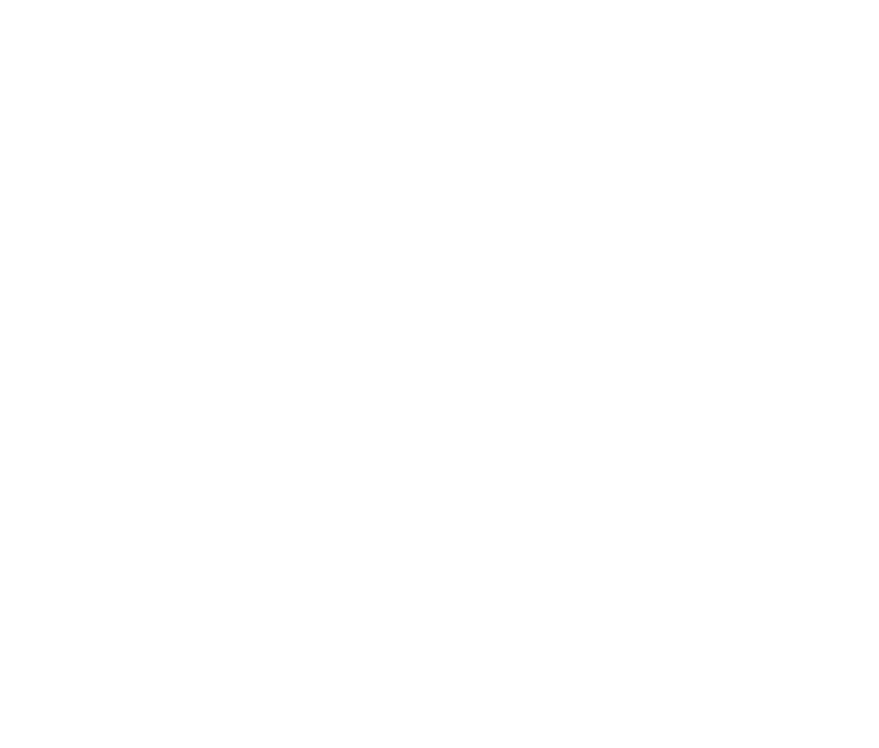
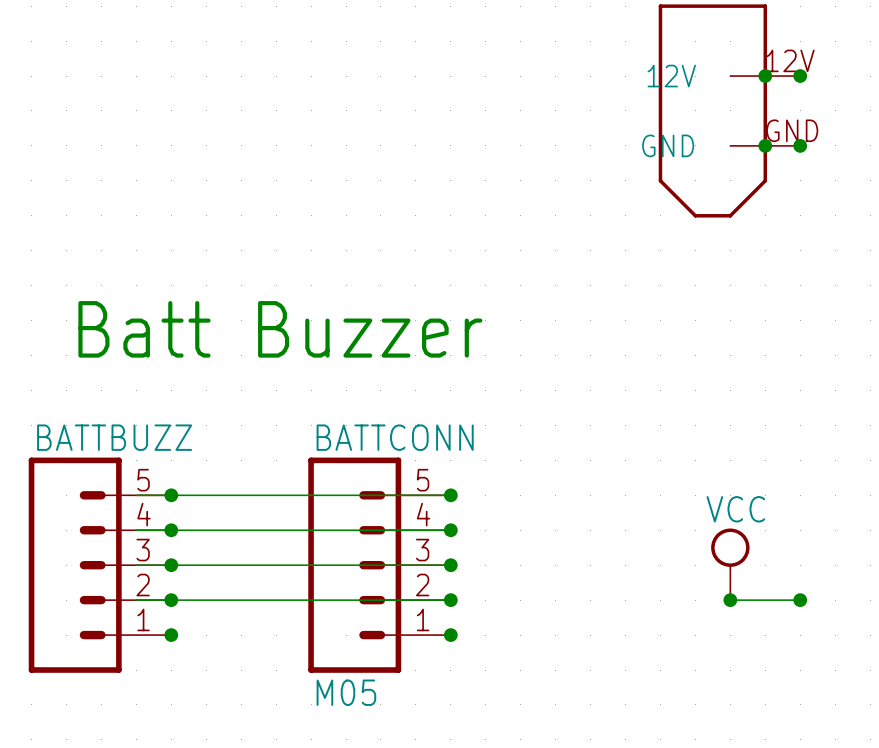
junction: none -> (765, 76)
junction: none -> (800, 76)
part: none -> (729, 110)
junction: none -> (765, 145)
junction: none -> (800, 145)
text: none -> Batt Buzzer (280, 329)
wire: none -> (136, 495) (450, 495)
junction: none -> (171, 495)
junction: none -> (450, 495)
wire: none -> (136, 530) (450, 530)
junction: none -> (171, 530)
junction: none -> (450, 530)
power symbol: none -> VCC (730, 564)
BATTBUZZ: none -> (100, 565)
wire: none -> (136, 565) (450, 565)
junction: none -> (171, 565)
BATTCONN: none -> M05 (379, 565)
junction: none -> (450, 565)
wire: none -> (136, 600) (450, 600)
junction: none -> (171, 600)
junction: none -> (450, 600)
wire: none -> (730, 600) (800, 600)
junction: none -> (730, 600)
junction: none -> (800, 600)
junction: none -> (171, 635)
junction: none -> (450, 635)

